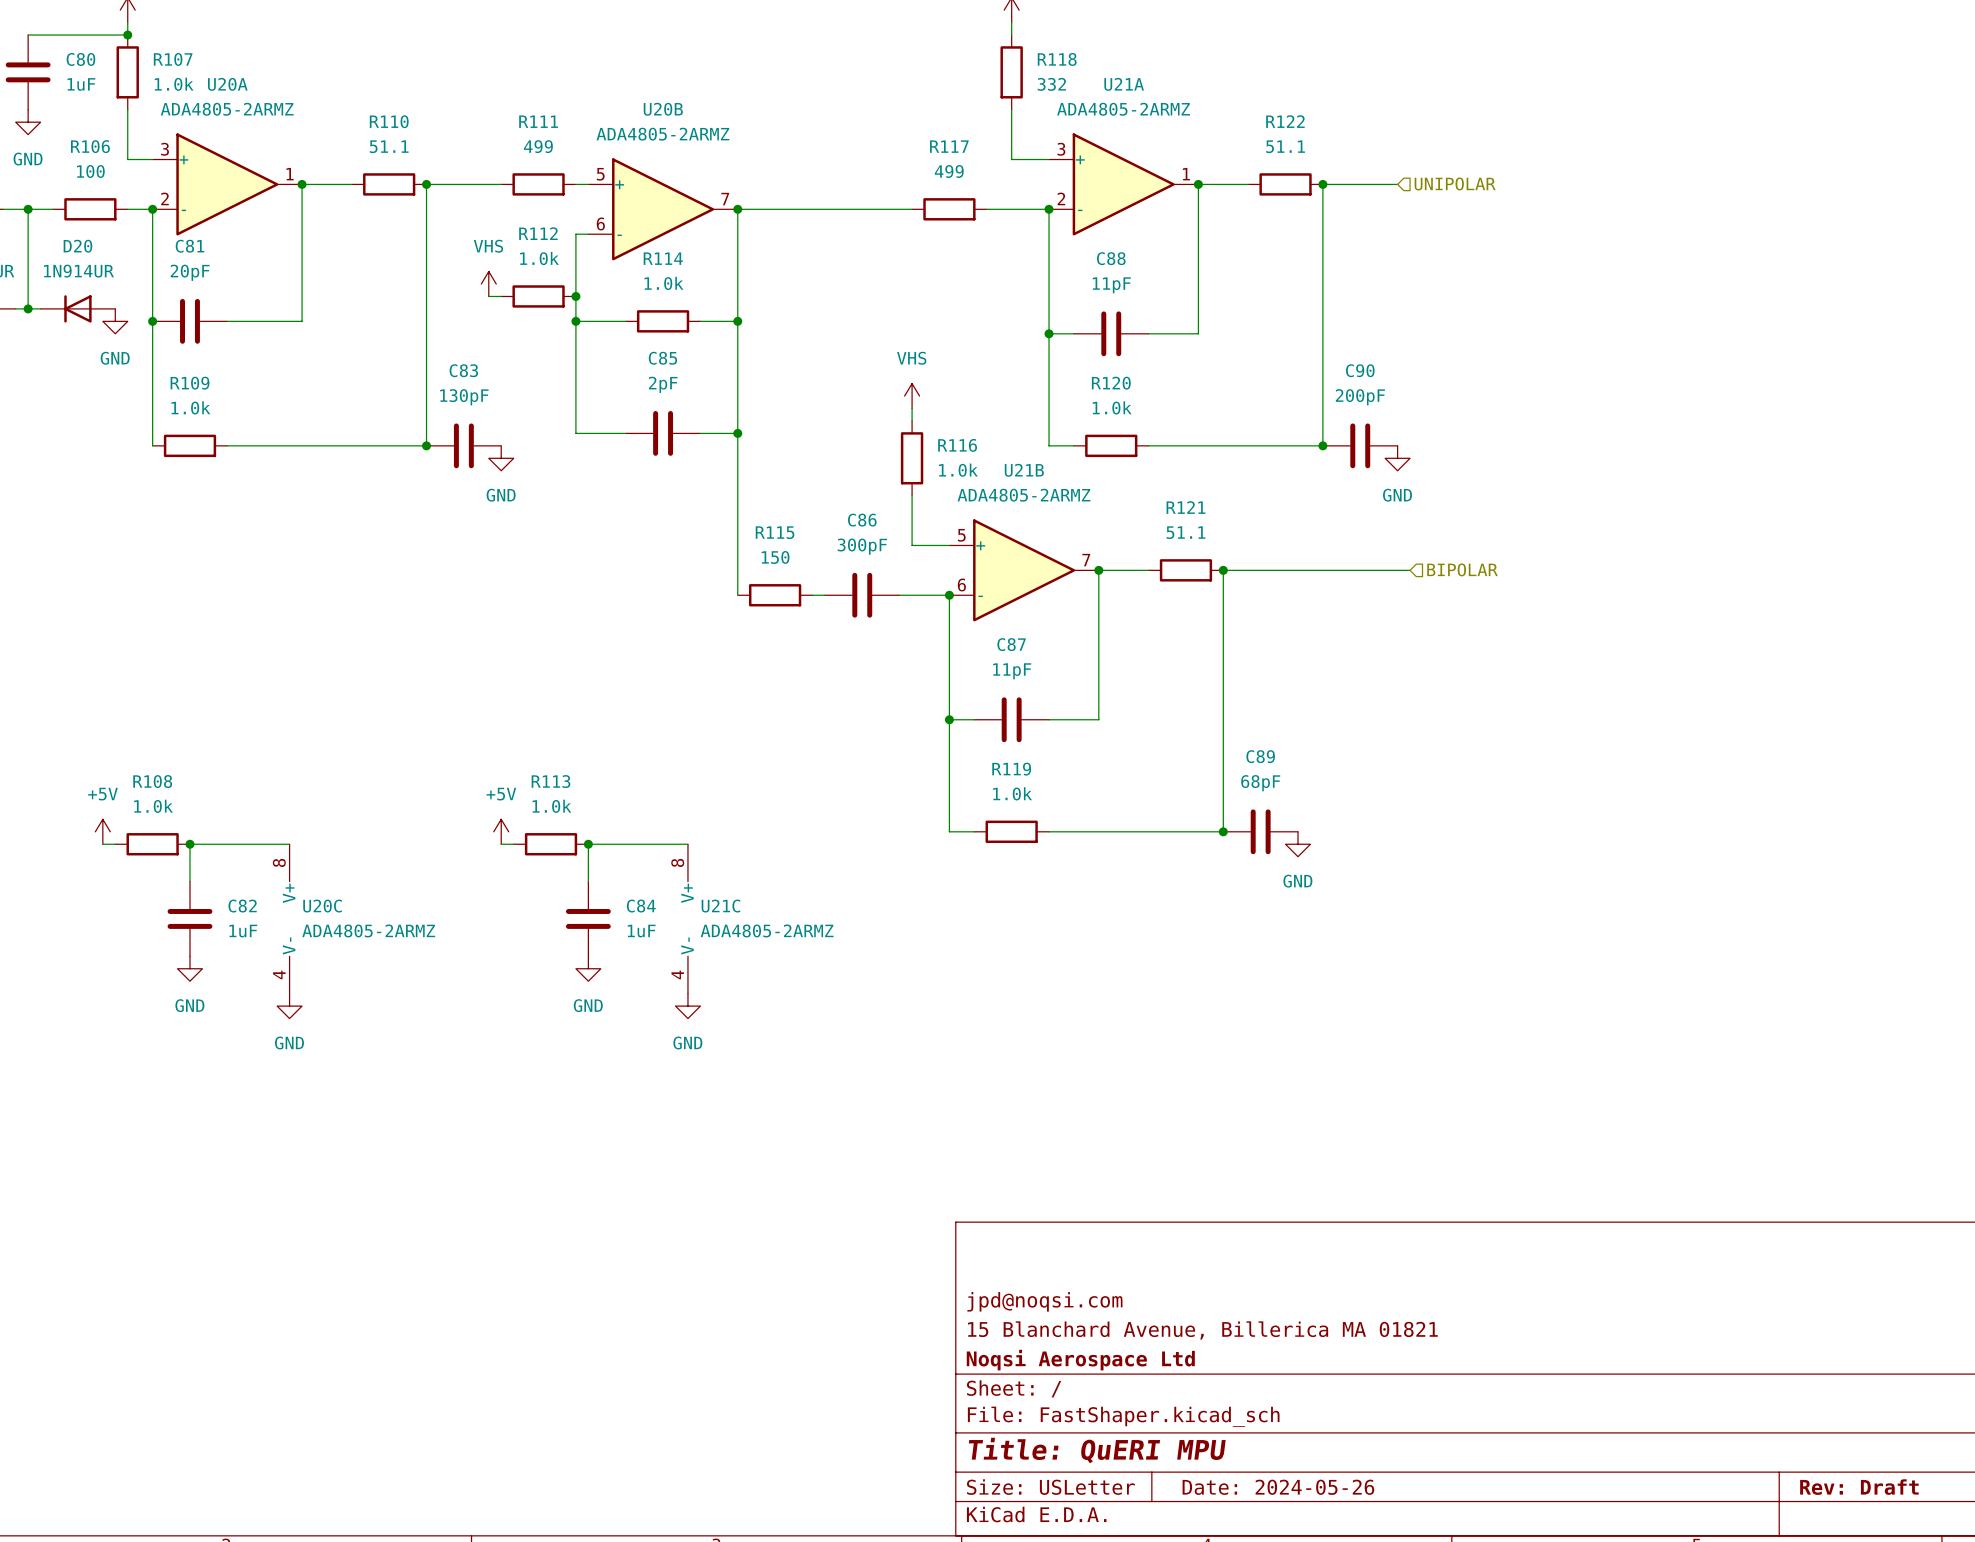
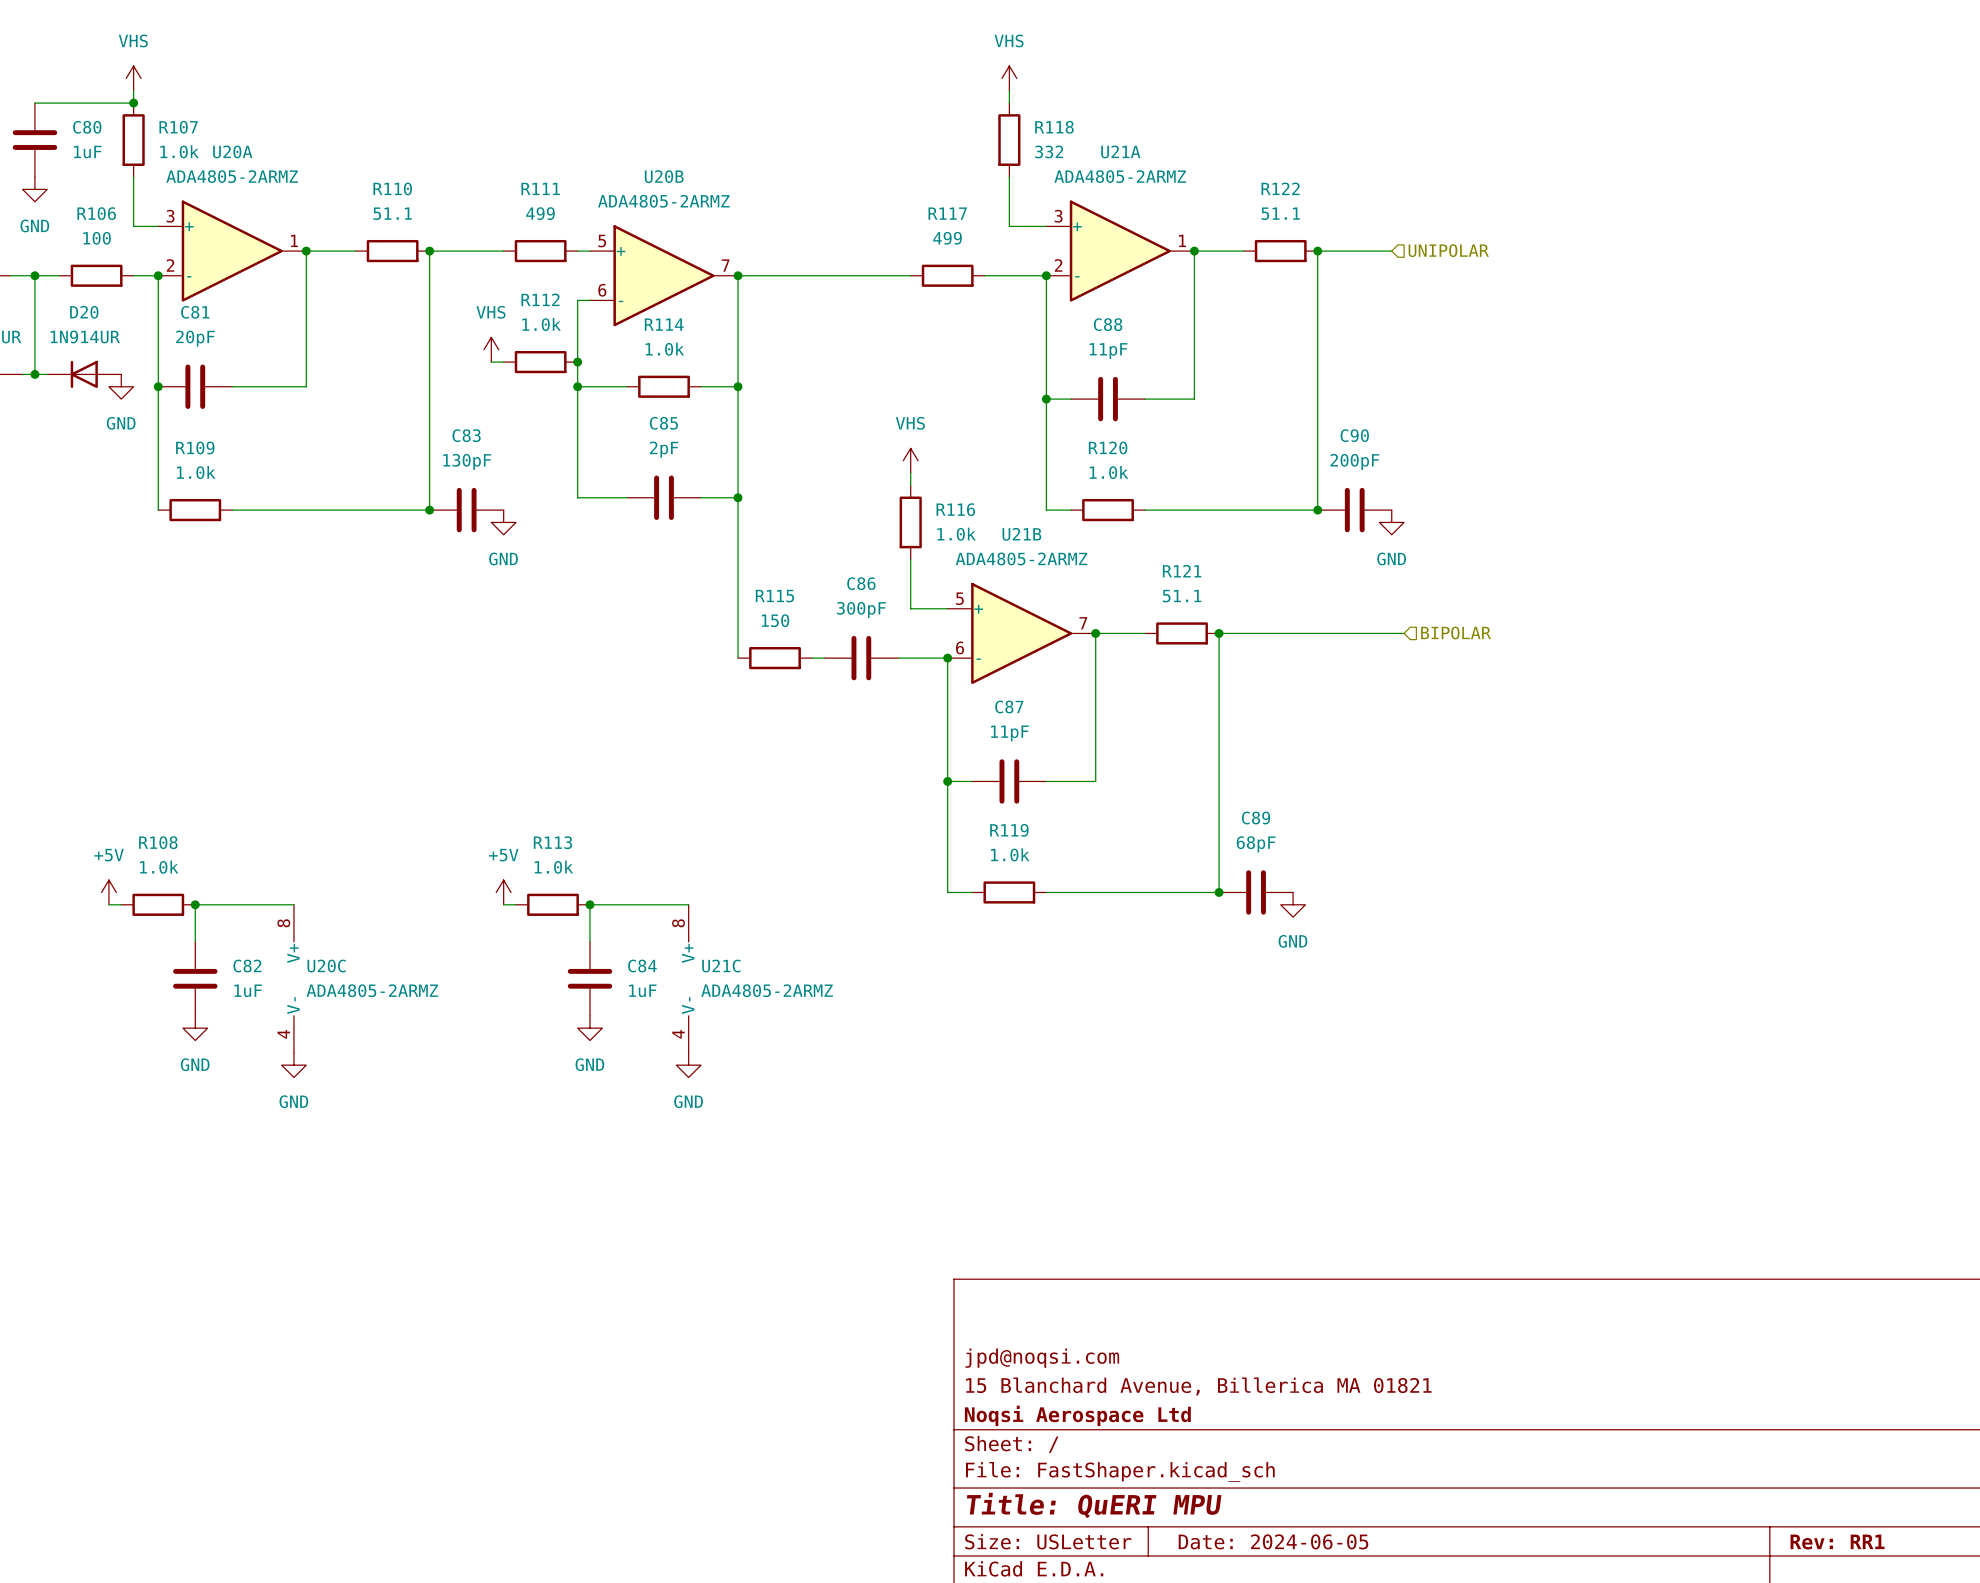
title block: Date: 2024-05-26 (1278, 1487) -> Date: 2024-06-05 (1273, 1541)
title block: Rev: Draft (1859, 1487) -> Rev: RR1 (1837, 1542)

